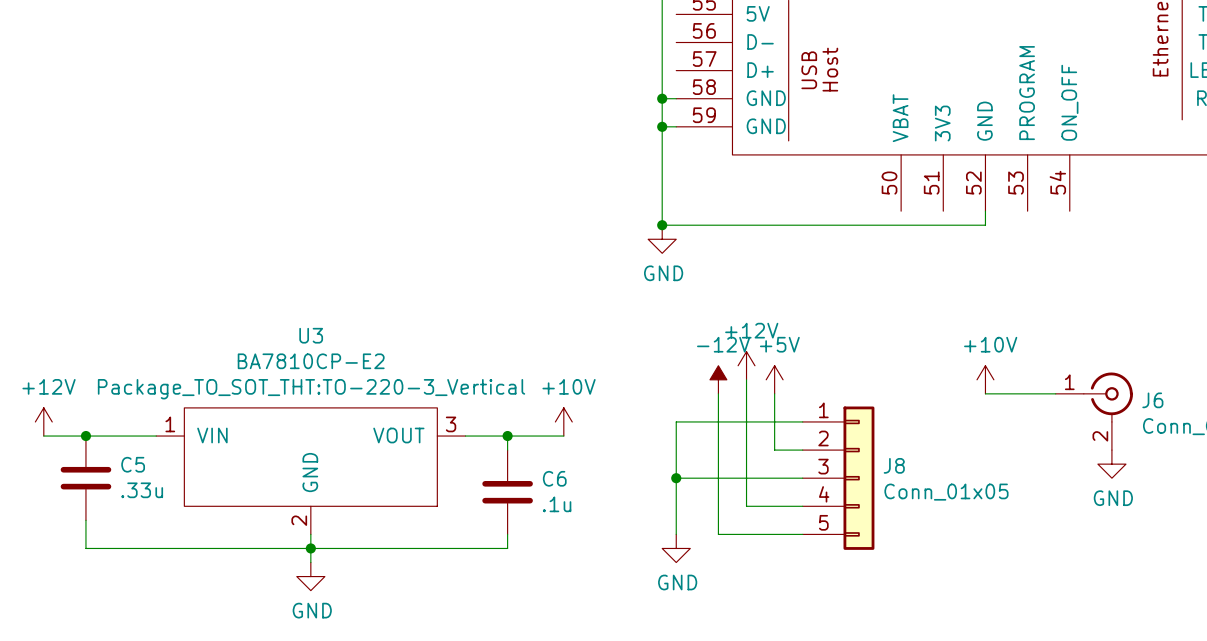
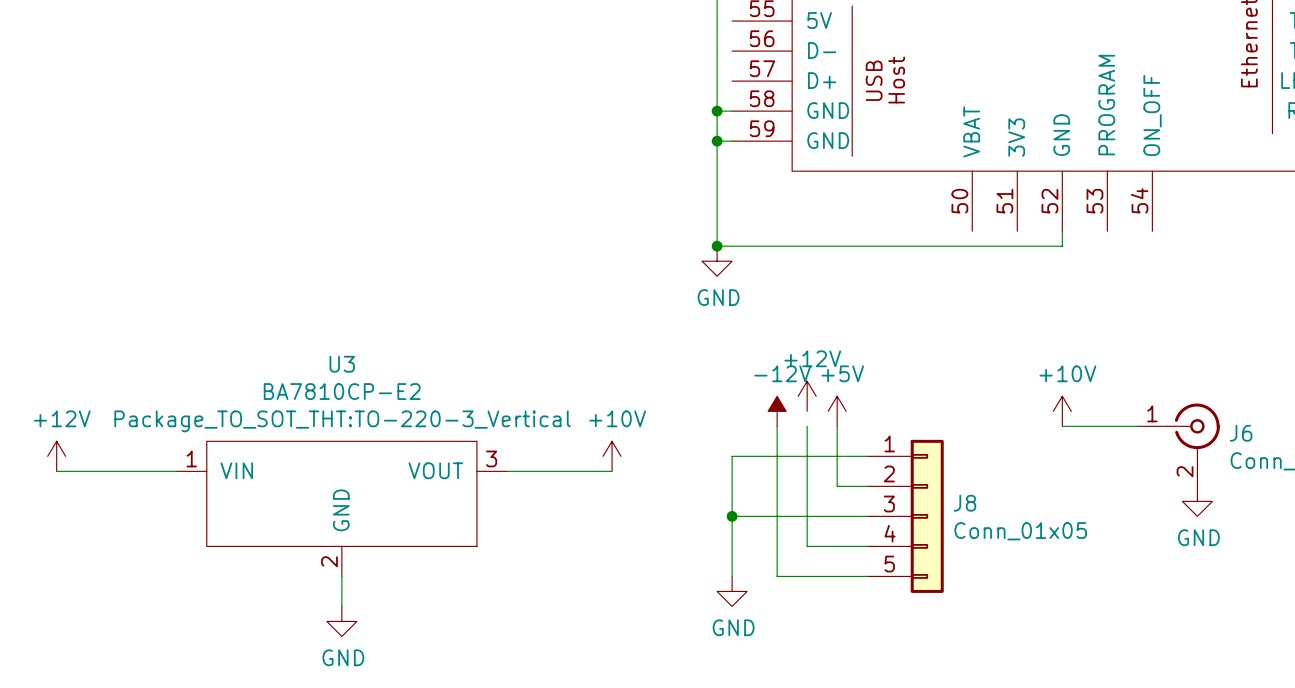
wire: (746, 379) (746, 393) -> none
junction: (85, 436) -> none
wire: (507, 436) (507, 450) -> none
junction: (507, 436) -> none
C5: .33u (85, 478) -> none
C6: .1u (507, 492) -> none
wire: (85, 520) (85, 548) (507, 548) (507, 534) -> none
junction: (310, 548) -> none

